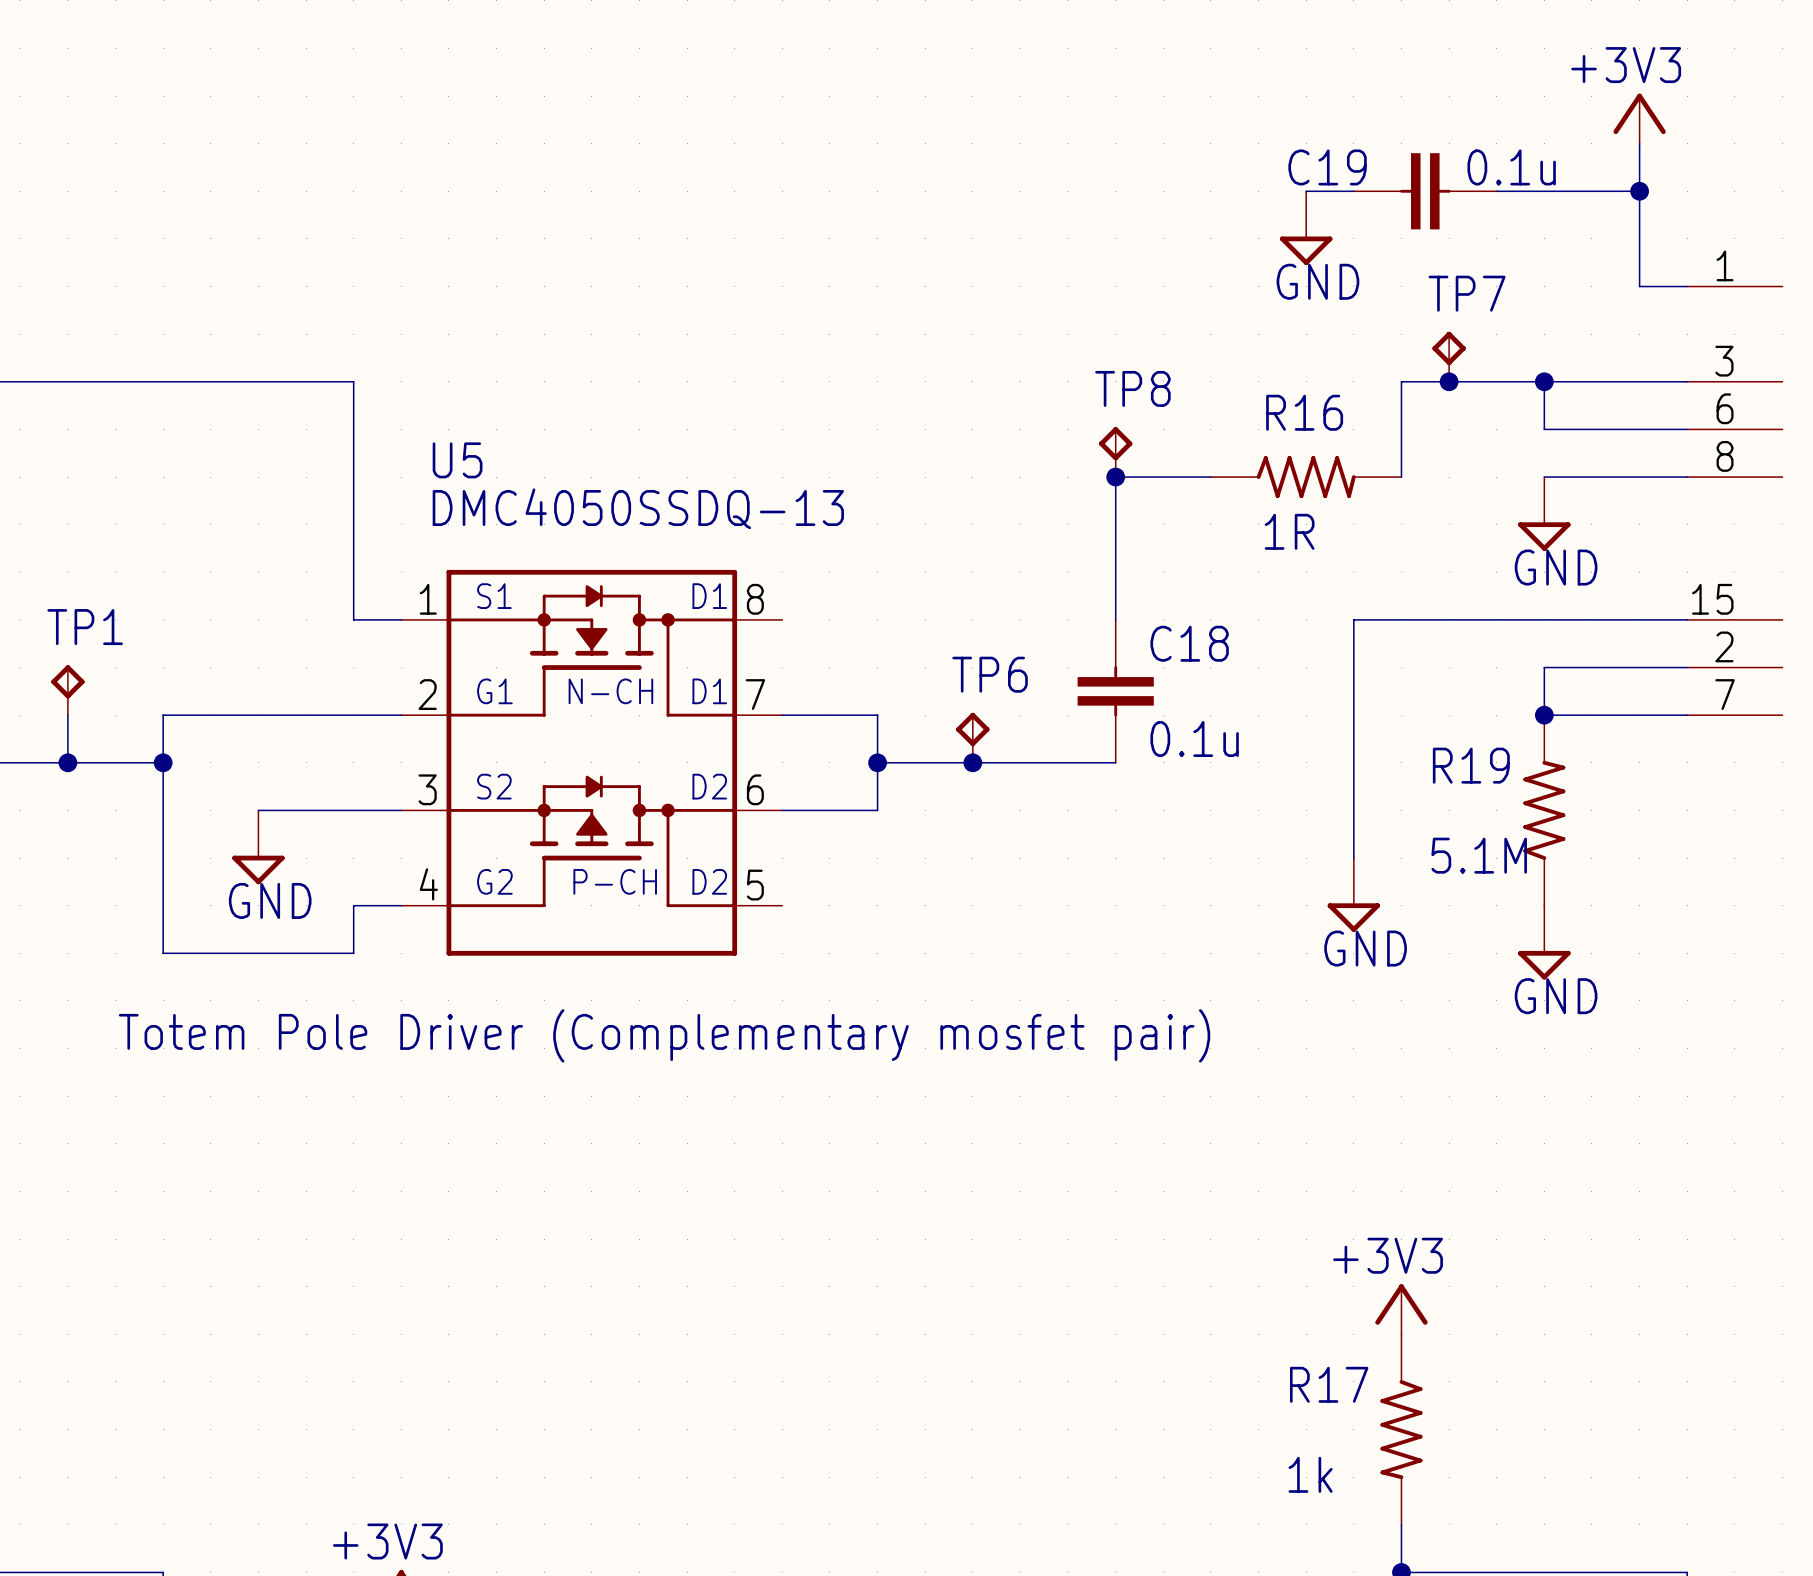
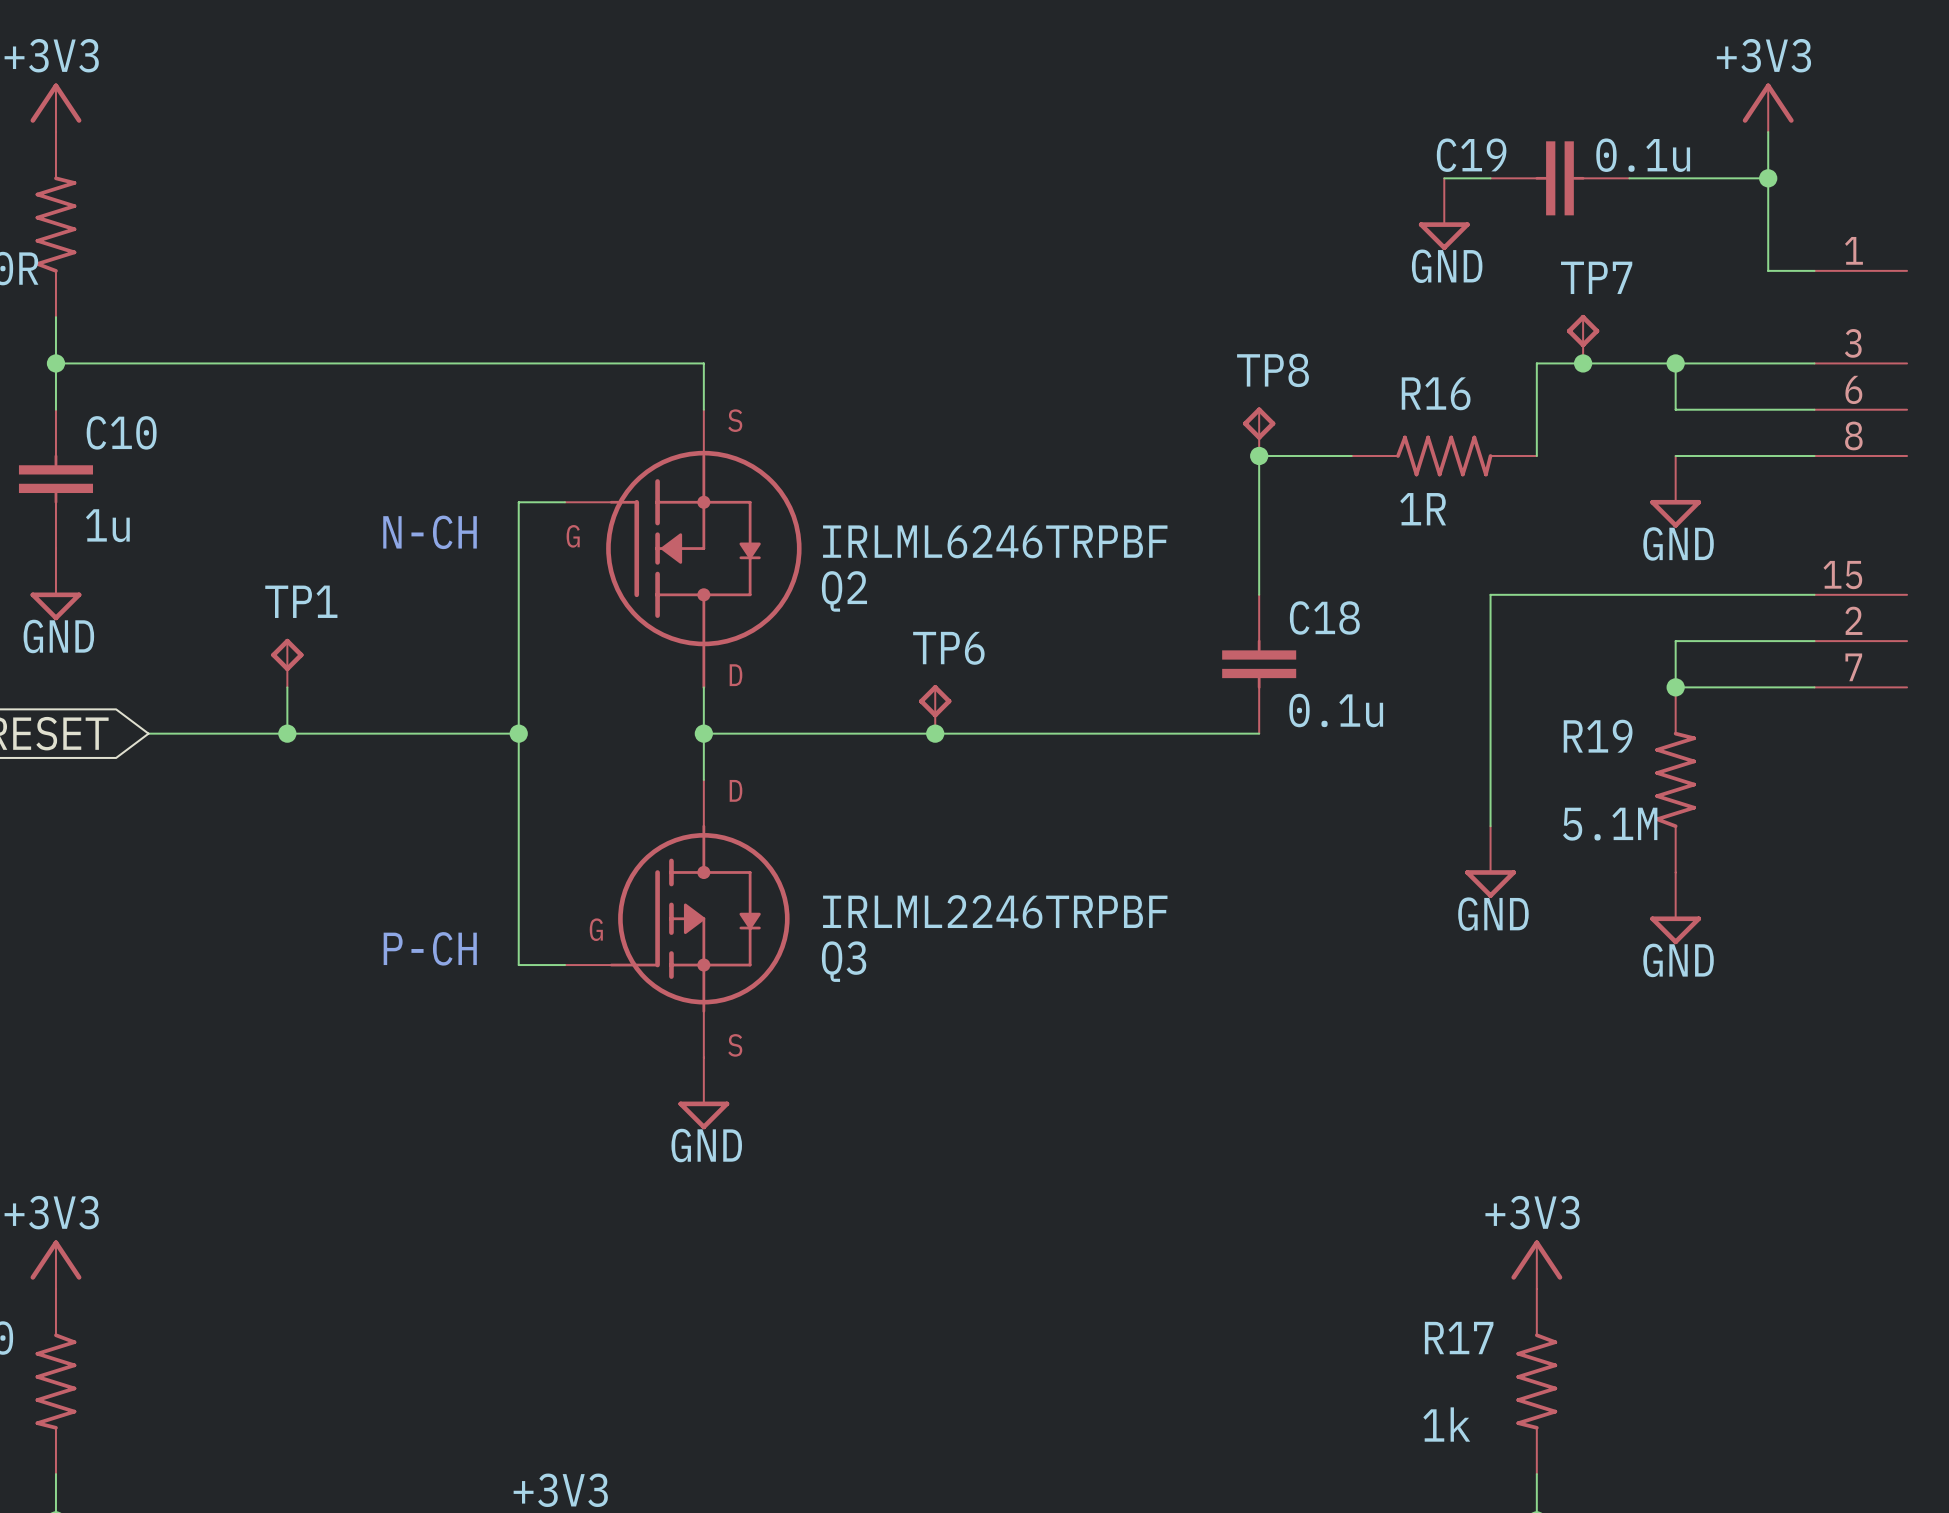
wire: (353, 381) (353, 524) -> (565, 502) (518, 502)
wire: none -> (518, 363) (703, 363) (703, 409)
text: none -> N-CH (430, 532)
Q2: none -> IRLML6246TRPBF (683, 549)
wire: (353, 619) (401, 619) -> (518, 594) (518, 872)
TP1 position: (67, 690) -> (287, 663)
wire: (67, 715) (67, 762) -> (287, 687) (287, 733)
wire: (401, 715) (163, 715) (163, 953) (353, 953) -> (565, 965) (518, 965) (518, 918)
wire: none -> (703, 687) (703, 779)
wire: (782, 715) (877, 715) (877, 810) (782, 810) -> none
TP6 position: (972, 737) -> (935, 709)
junction: (67, 762) -> none
junction: none -> (287, 733)
wire: none -> (333, 733) (518, 733)
junction: (163, 762) -> none
junction: none -> (518, 733)
wire: none -> (703, 733) (1027, 733)
junction: none -> (703, 733)
U5: DMC4050SSDQ-13 (591, 762) -> none
junction: none -> (935, 733)
junction: (877, 762) -> none
junction: (972, 762) -> none
wire: (258, 810) (401, 810) -> none
power symbol position: GND (258, 847) -> GND (703, 1093)
wire: (353, 905) (401, 905) -> none
Q3: none -> IRLML2246TRPBF (677, 918)
text: none -> P-CH (430, 948)
text: Totem Pole Driver (Complementary mosfet pair) (664, 1035) -> none

